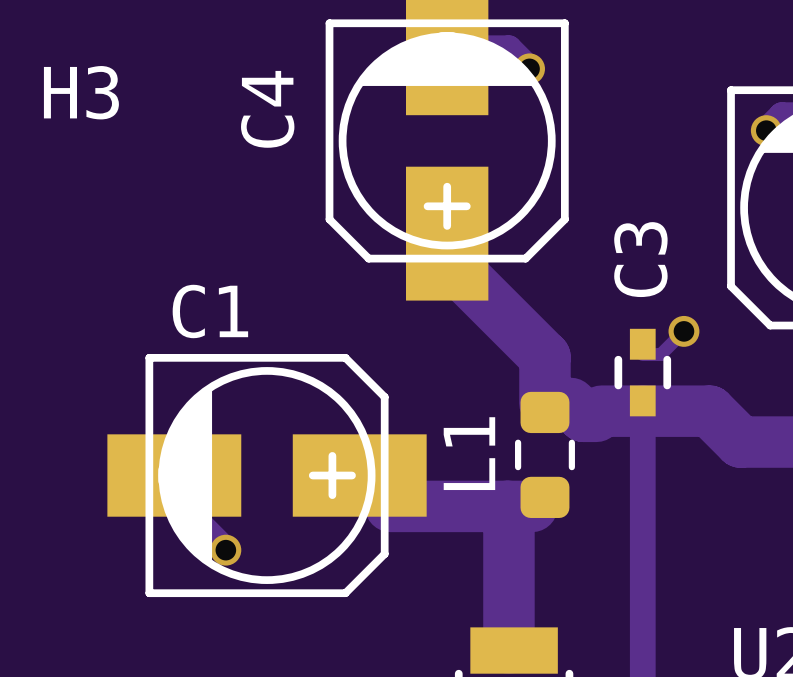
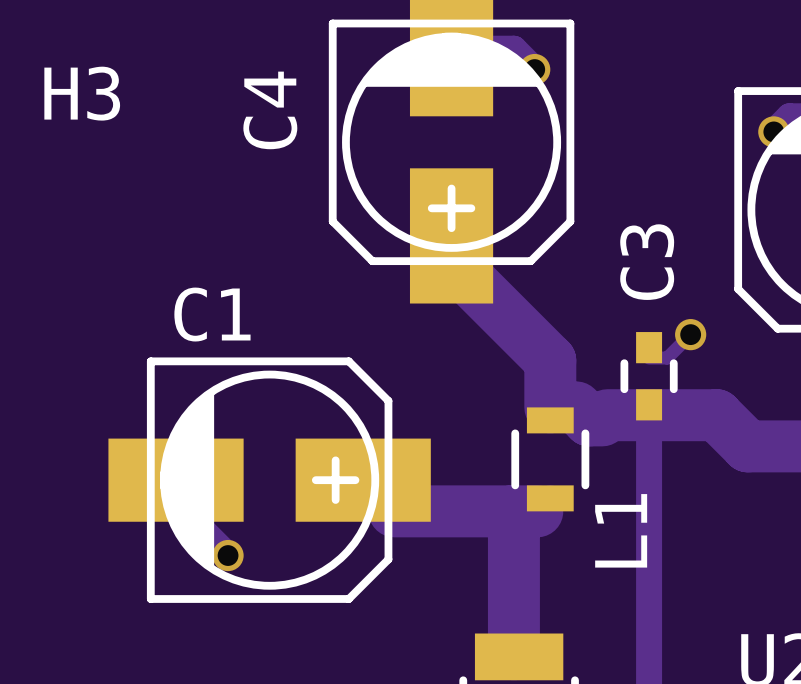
L1 footprint: [515, 391, 575, 518] -> [511, 407, 590, 512]
L1 name position: L1 (469, 453) -> L1 (621, 530)

